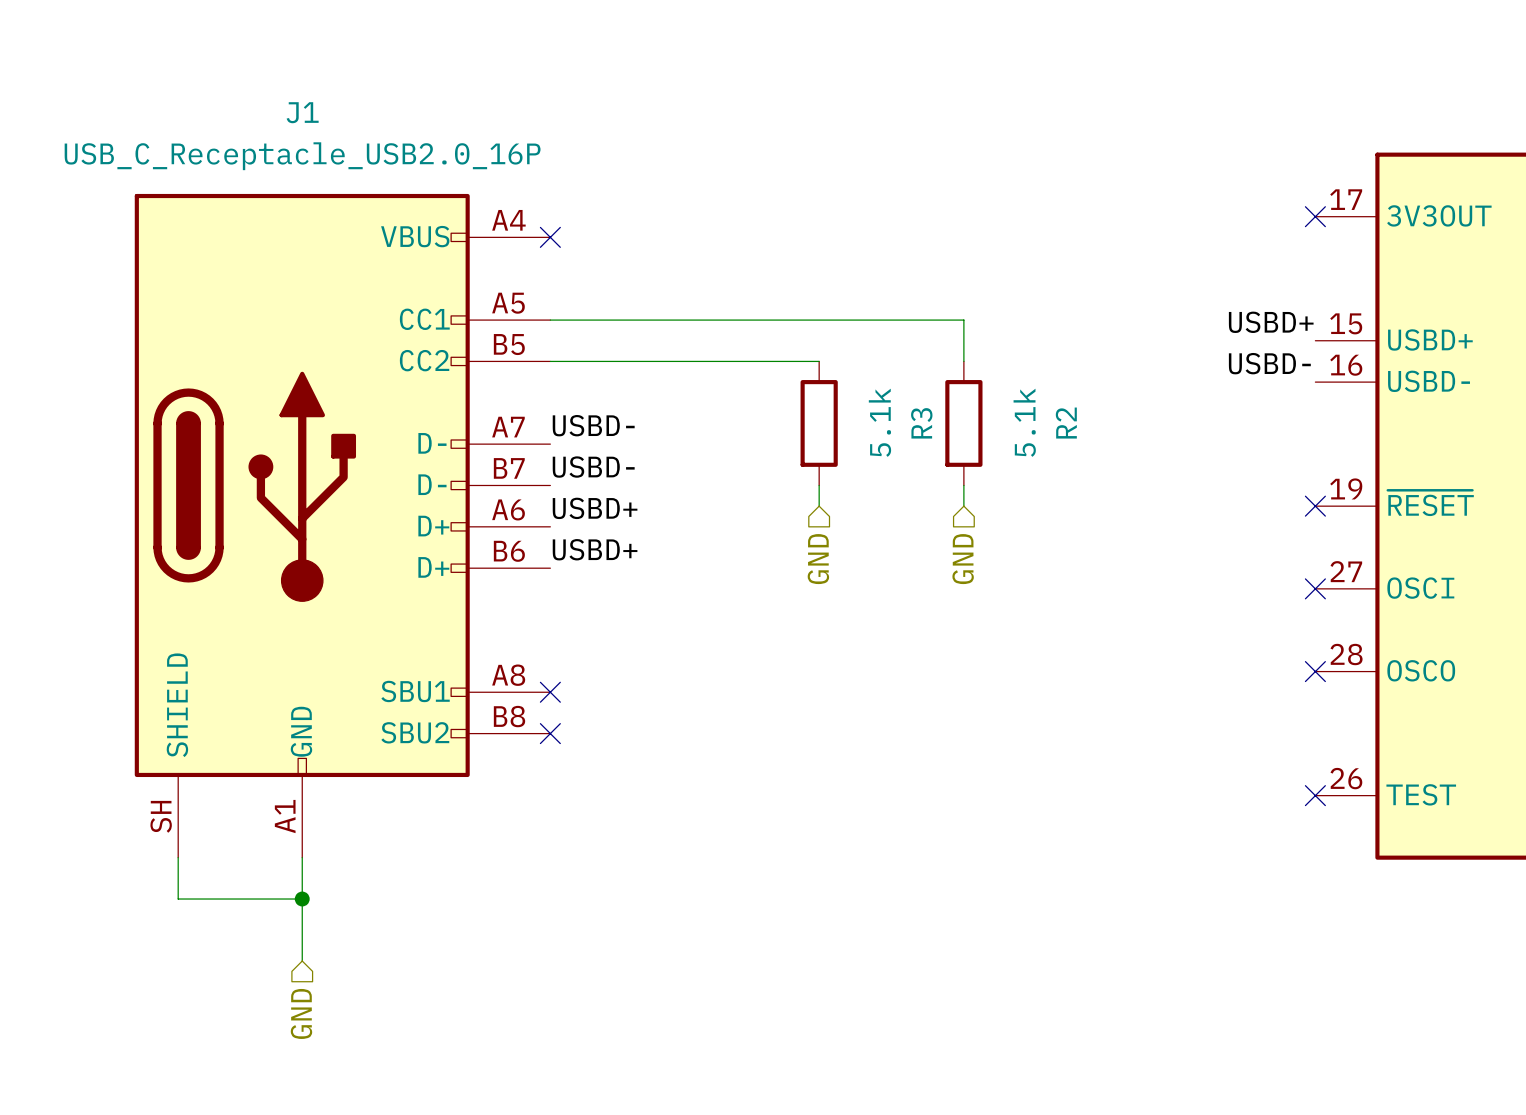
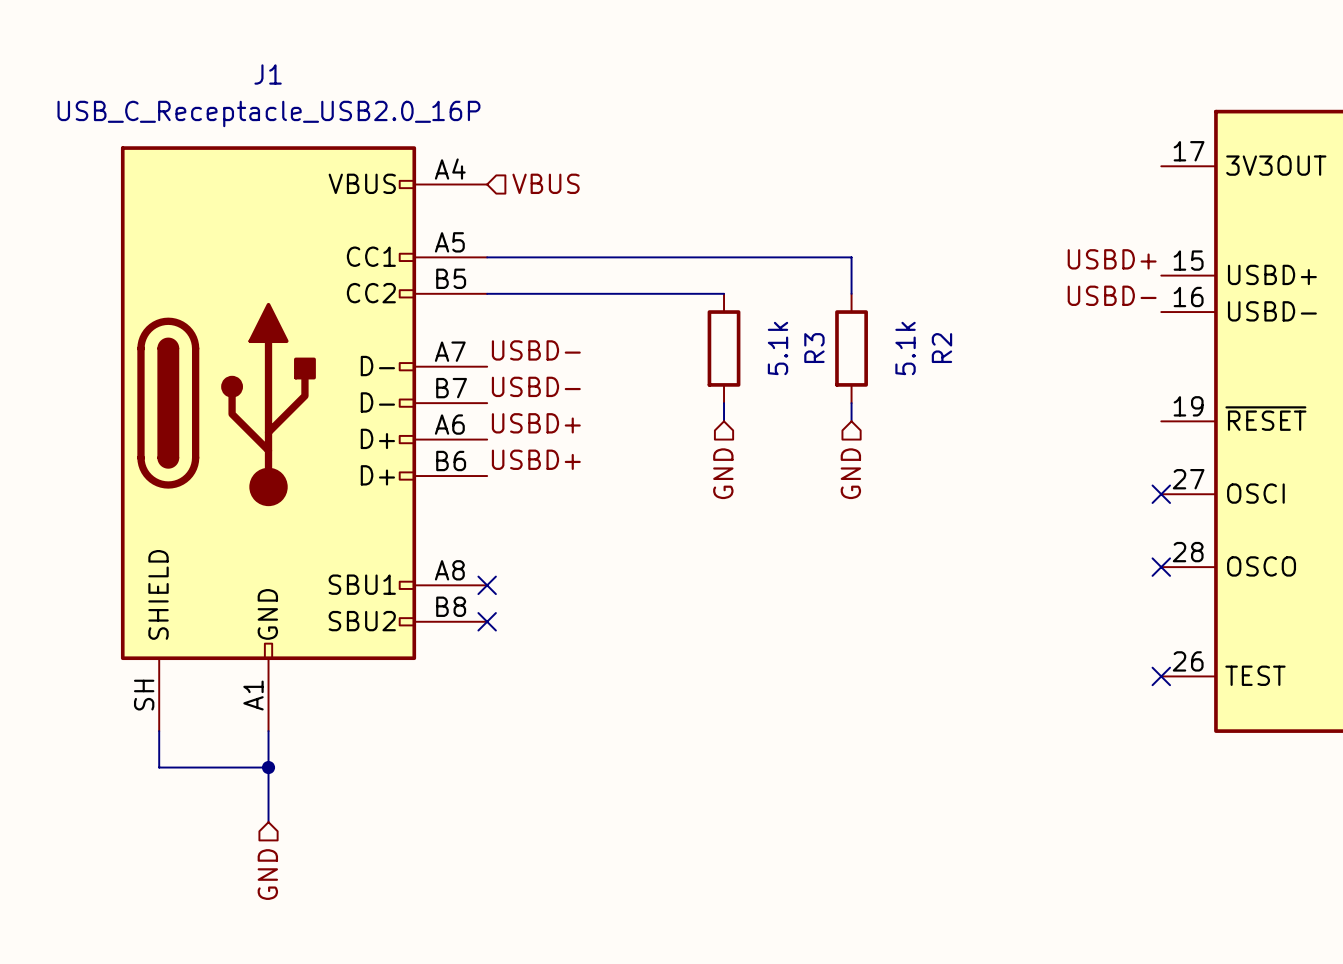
no-connect mark: (1315, 216) -> none
hierarchical label: none -> VBUS (546, 183)
no-connect mark: (550, 237) -> none
no-connect mark: (1315, 506) -> none

